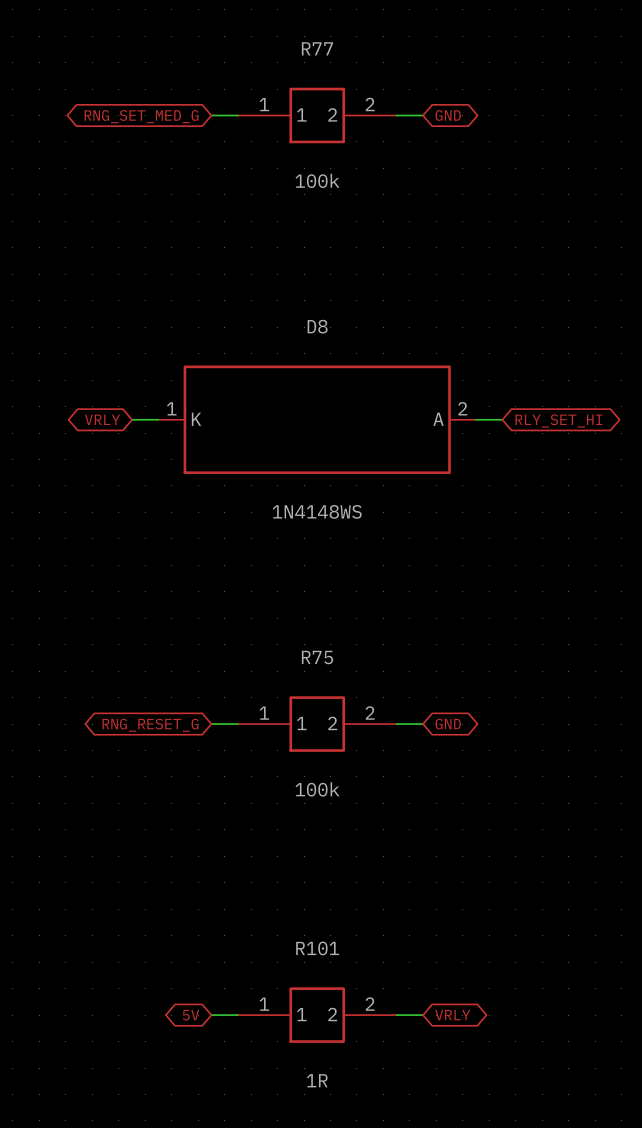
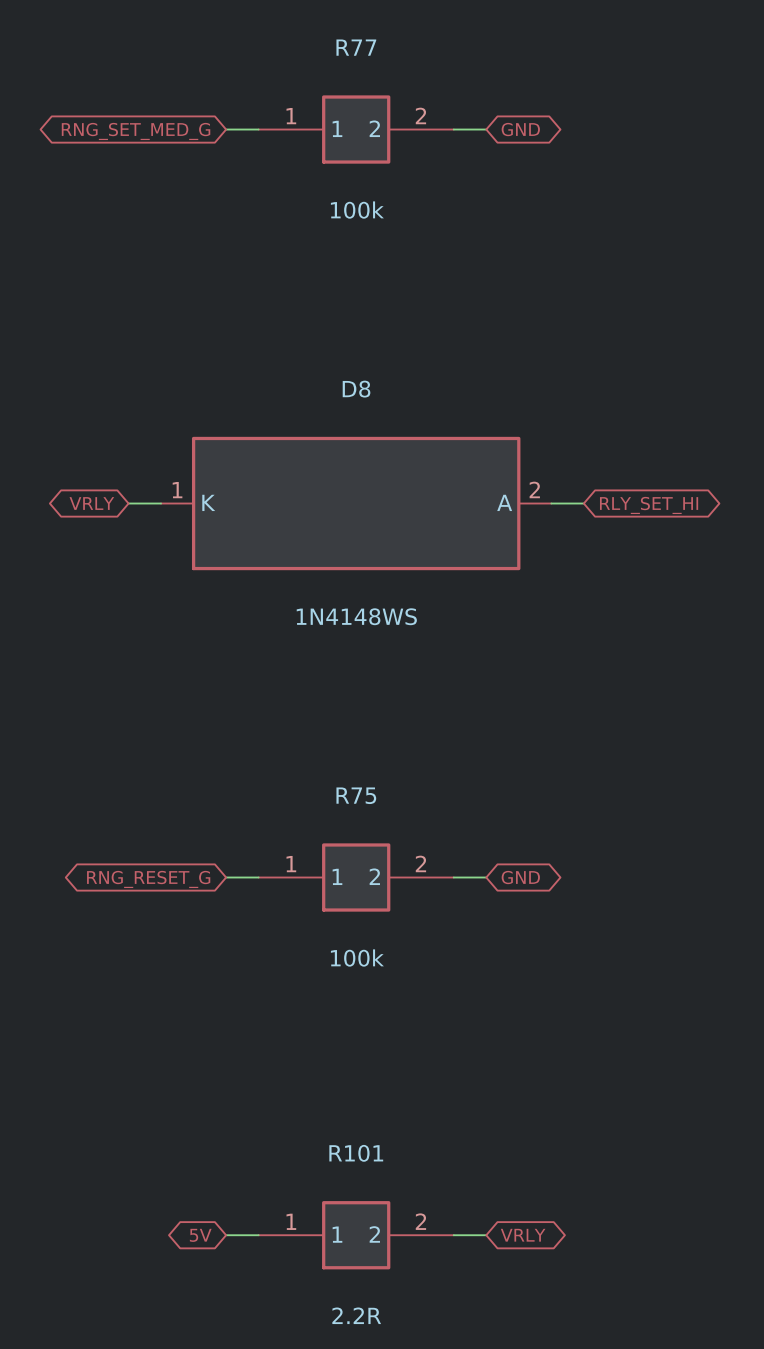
R101 value: 1R (317, 1080) -> 2.2R (356, 1315)

